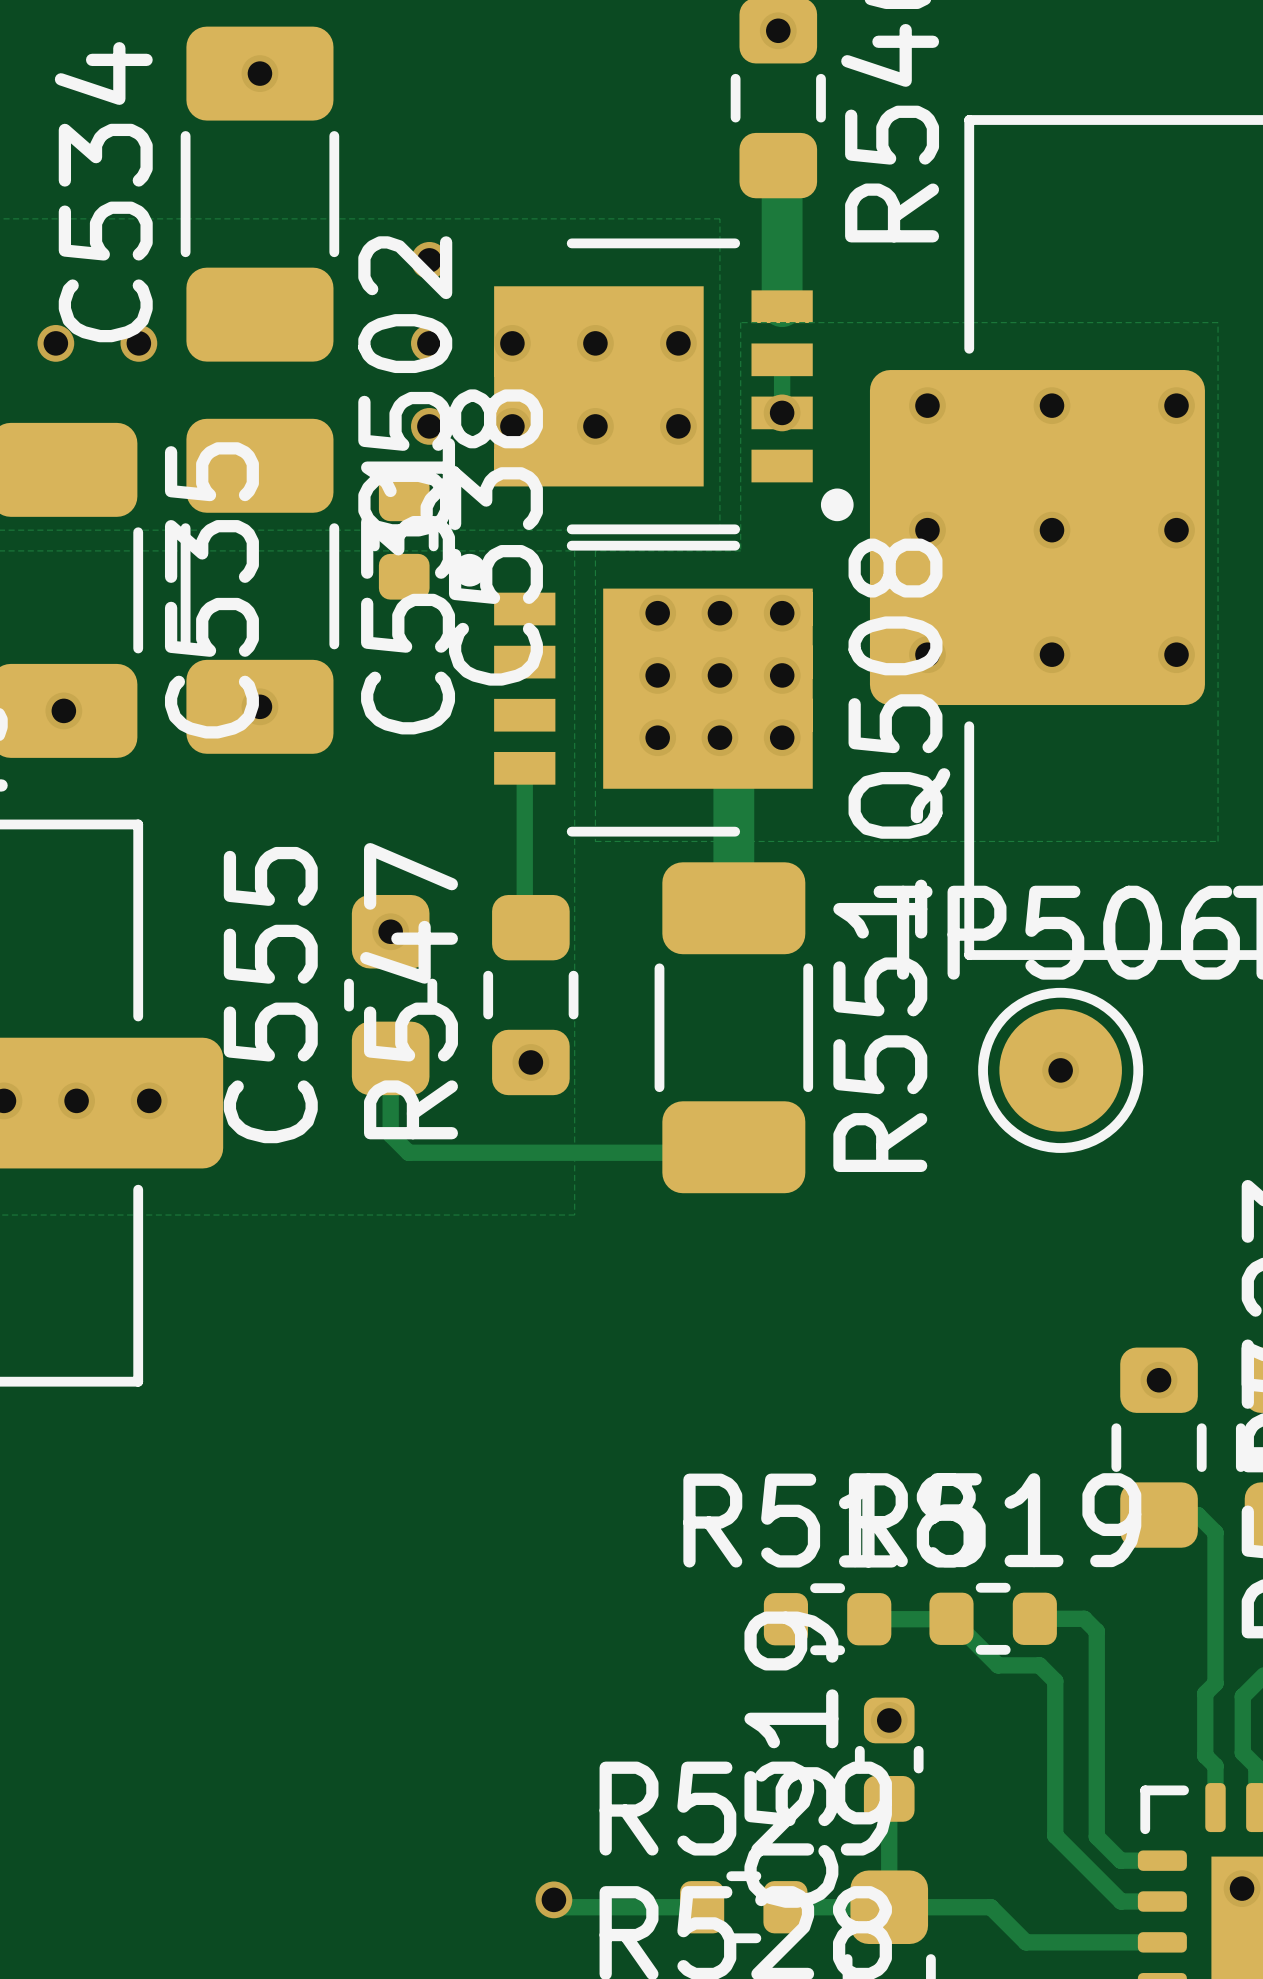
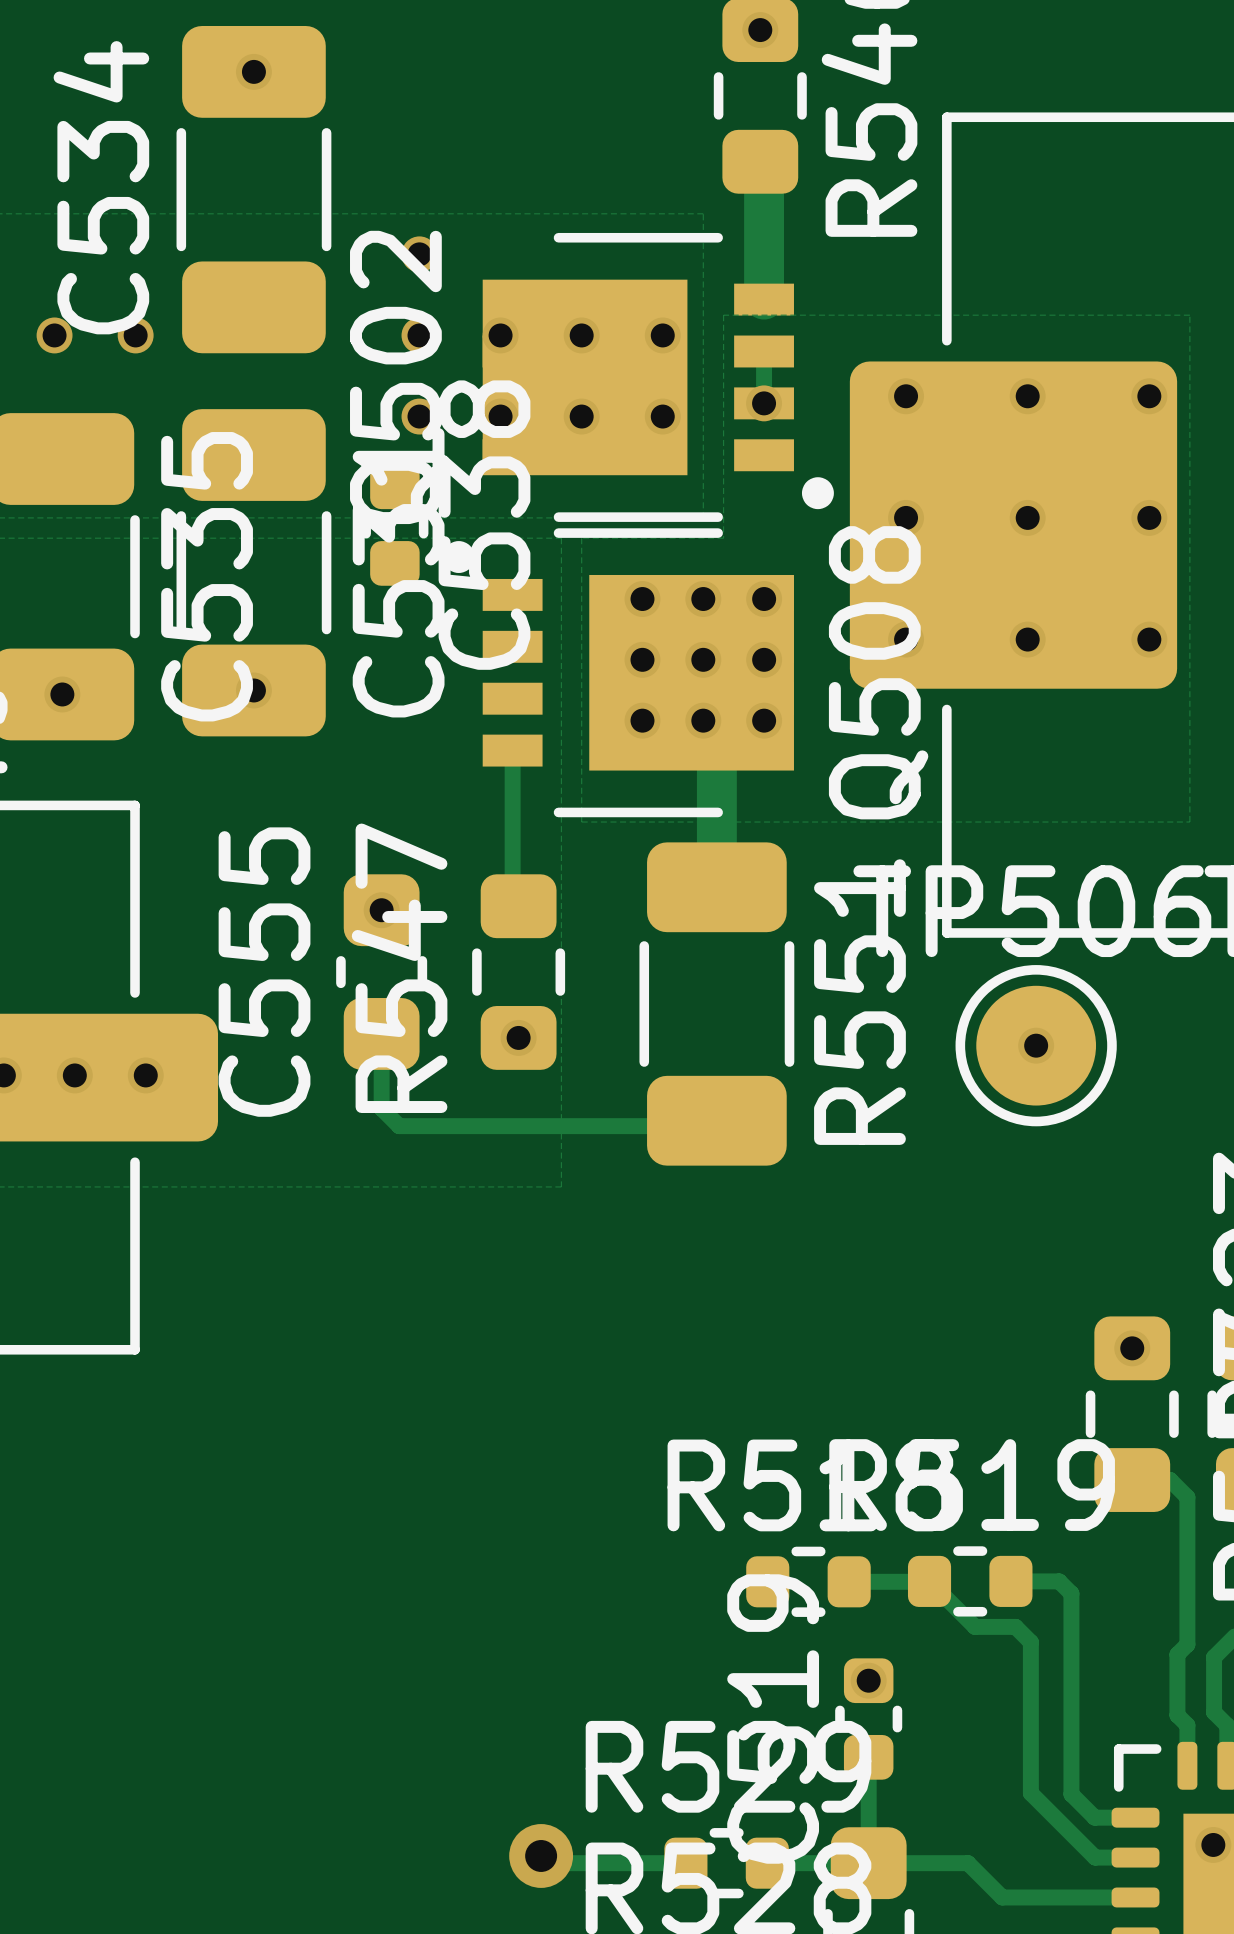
via size: [535, 1881, 573, 1919] -> [509, 1824, 574, 1888]

